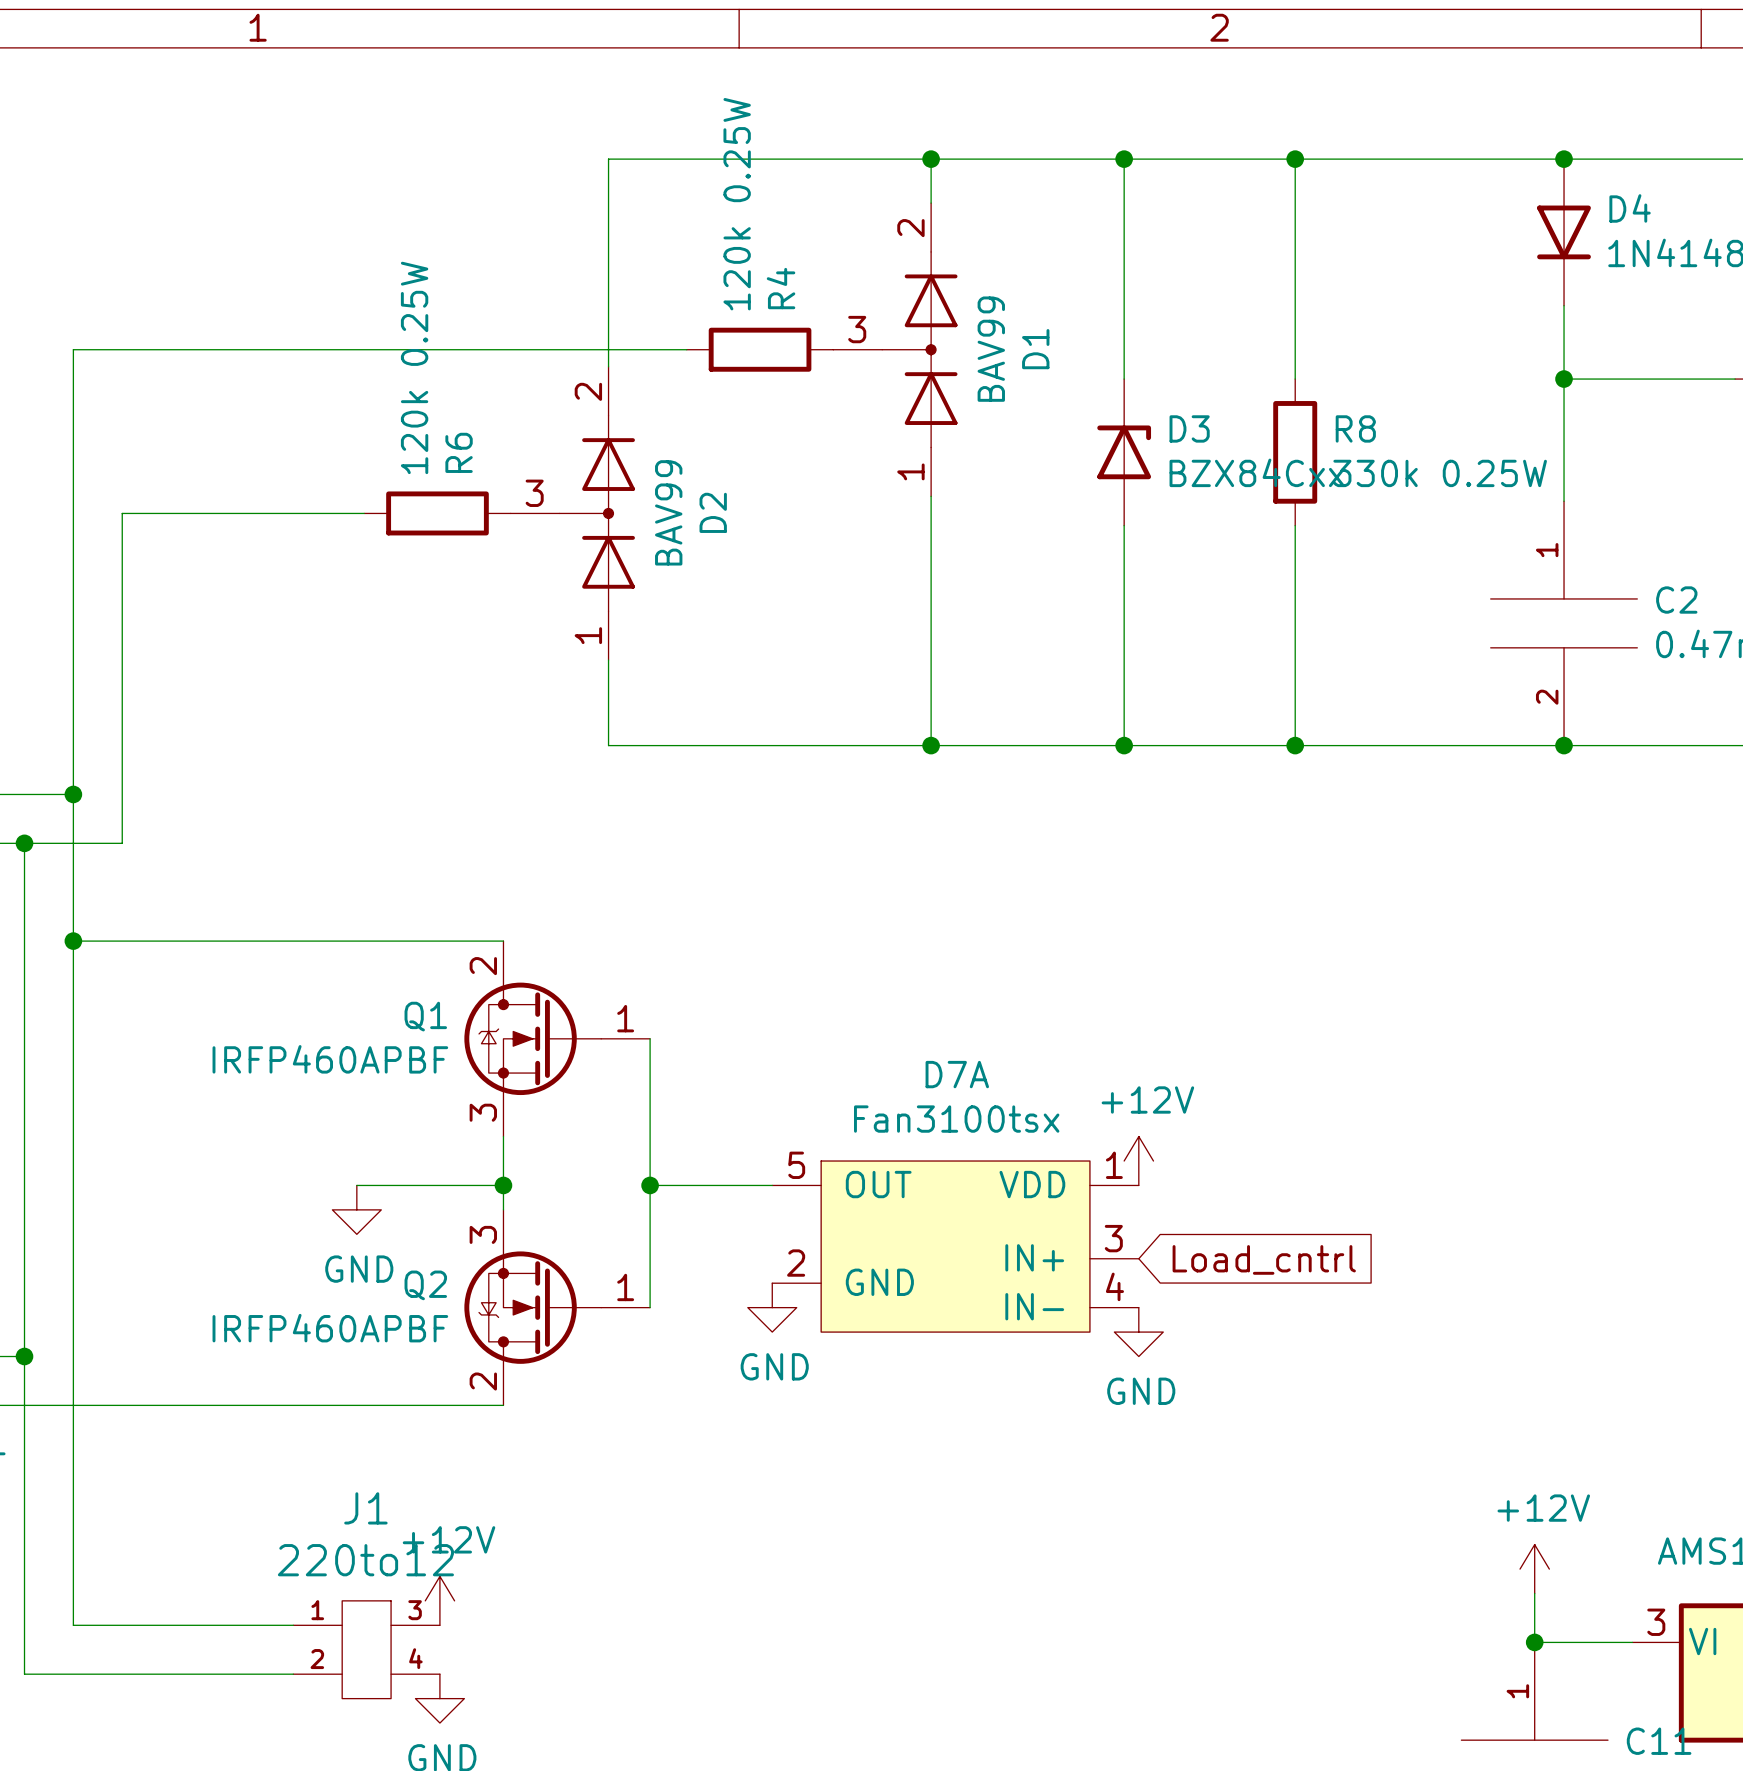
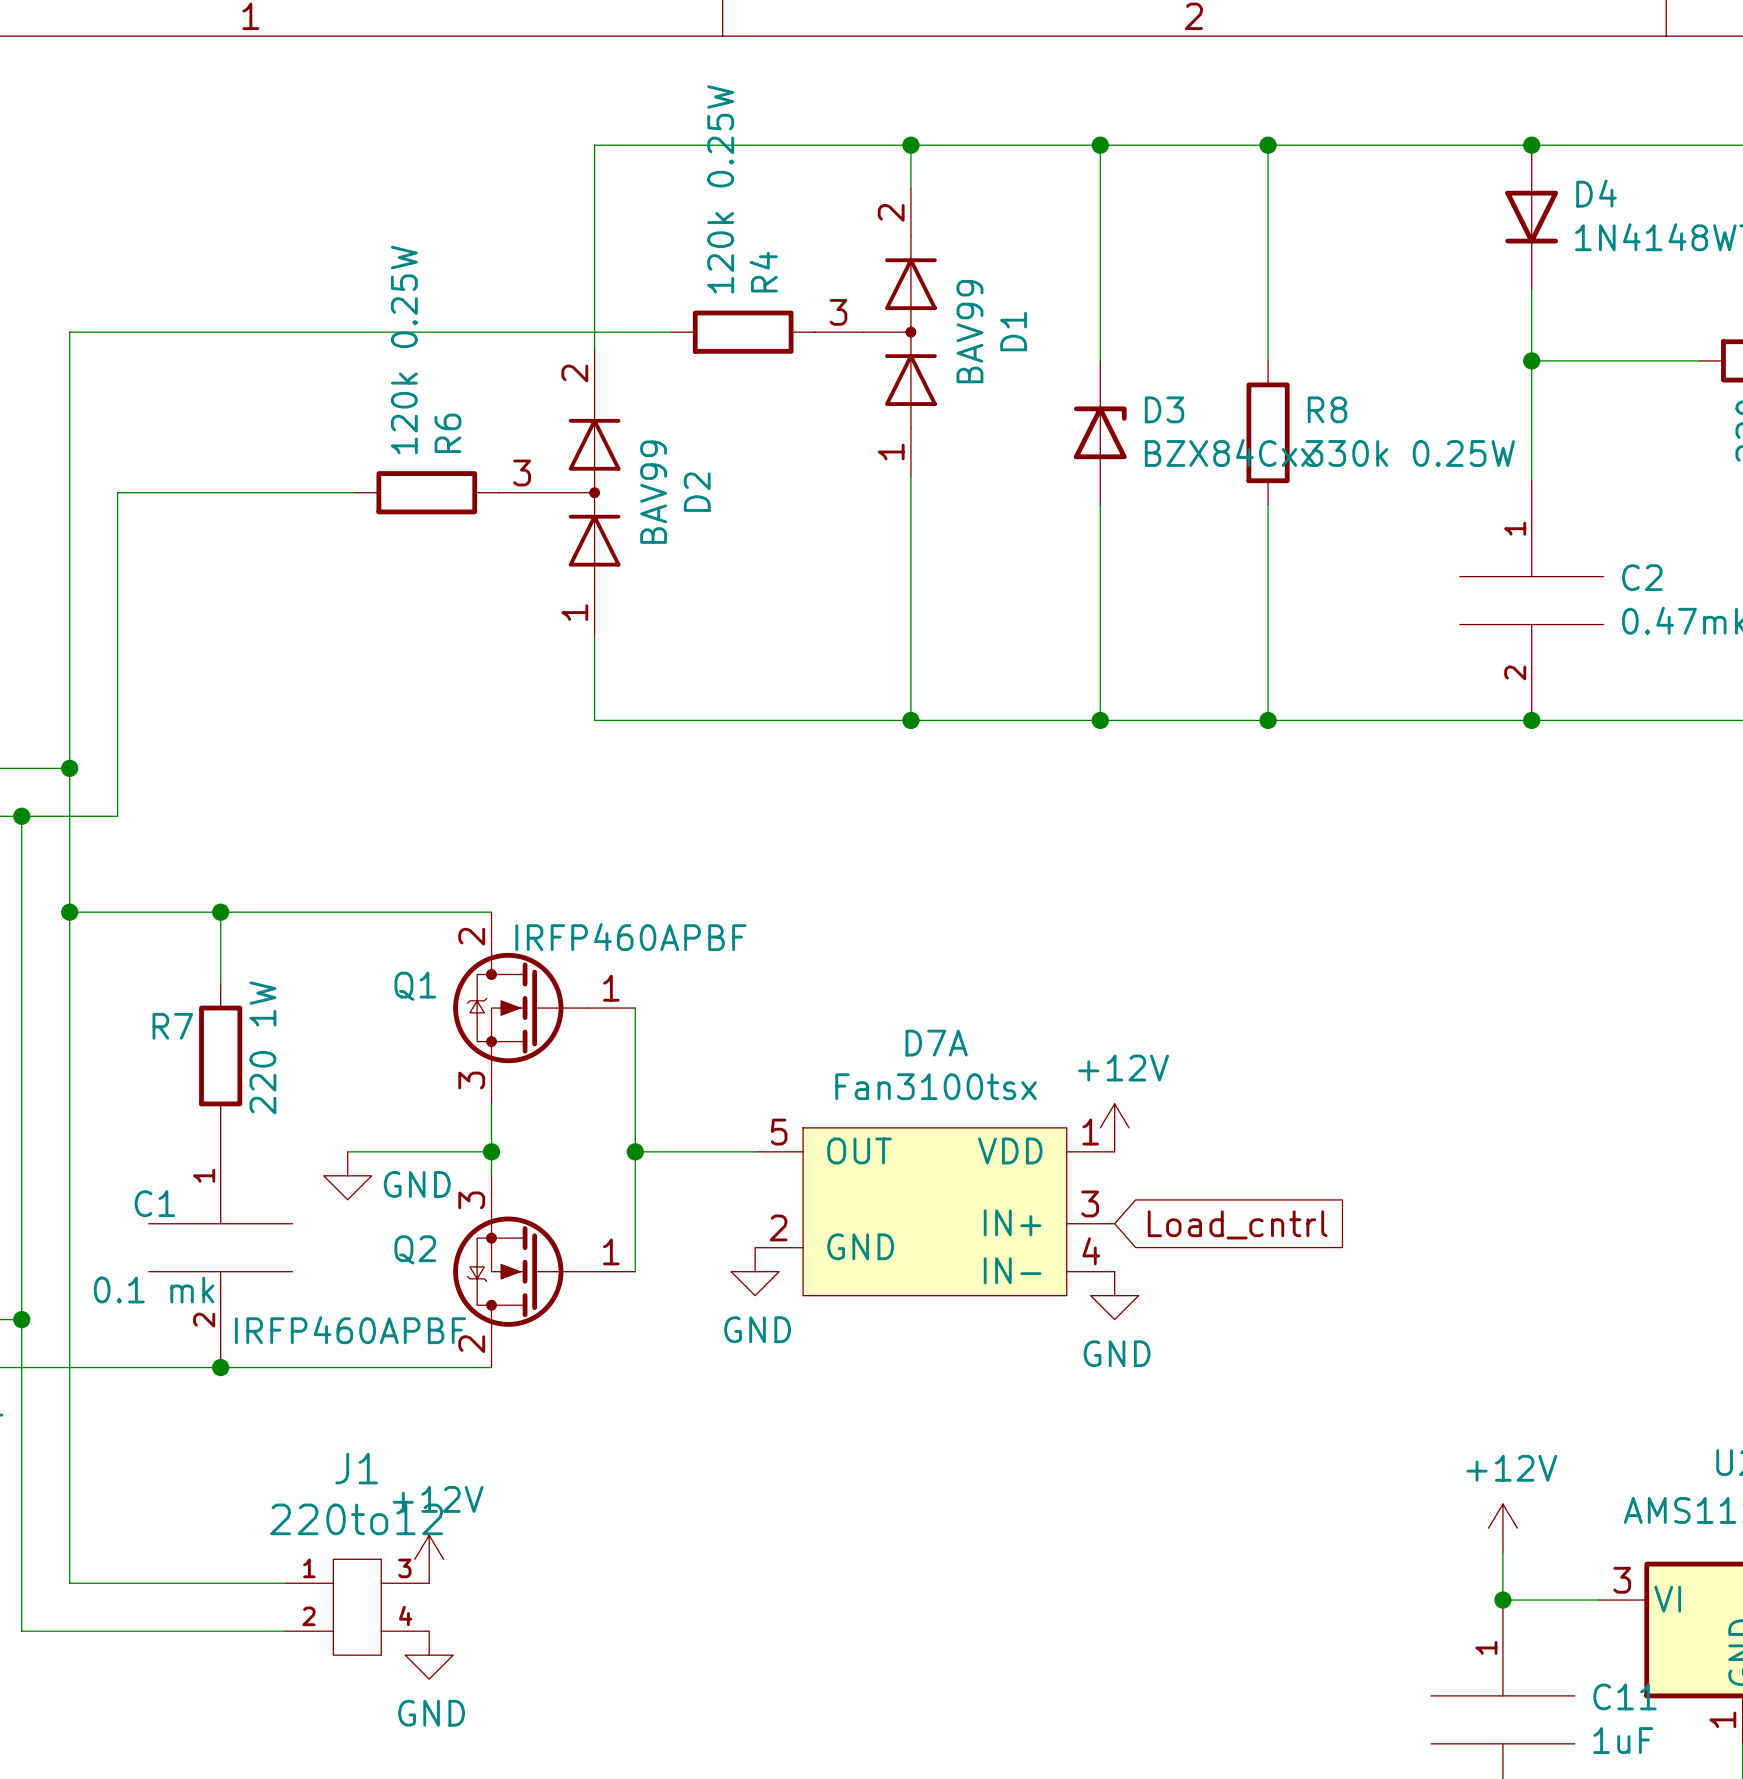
wire: none -> (220, 912) (220, 984)
junction: none -> (220, 912)
Q1 value position: IRFP460APBF (330, 1059) -> IRFP460APBF (630, 937)
R7: none -> 220 1W (220, 1055)
power symbol text position: GND (359, 1269) -> GND (417, 1184)
C1: none -> 0.1 mk (220, 1247)
Q2 value position: IRFP460APBF (330, 1328) -> IRFP460APBF (350, 1330)
junction: none -> (220, 1367)

